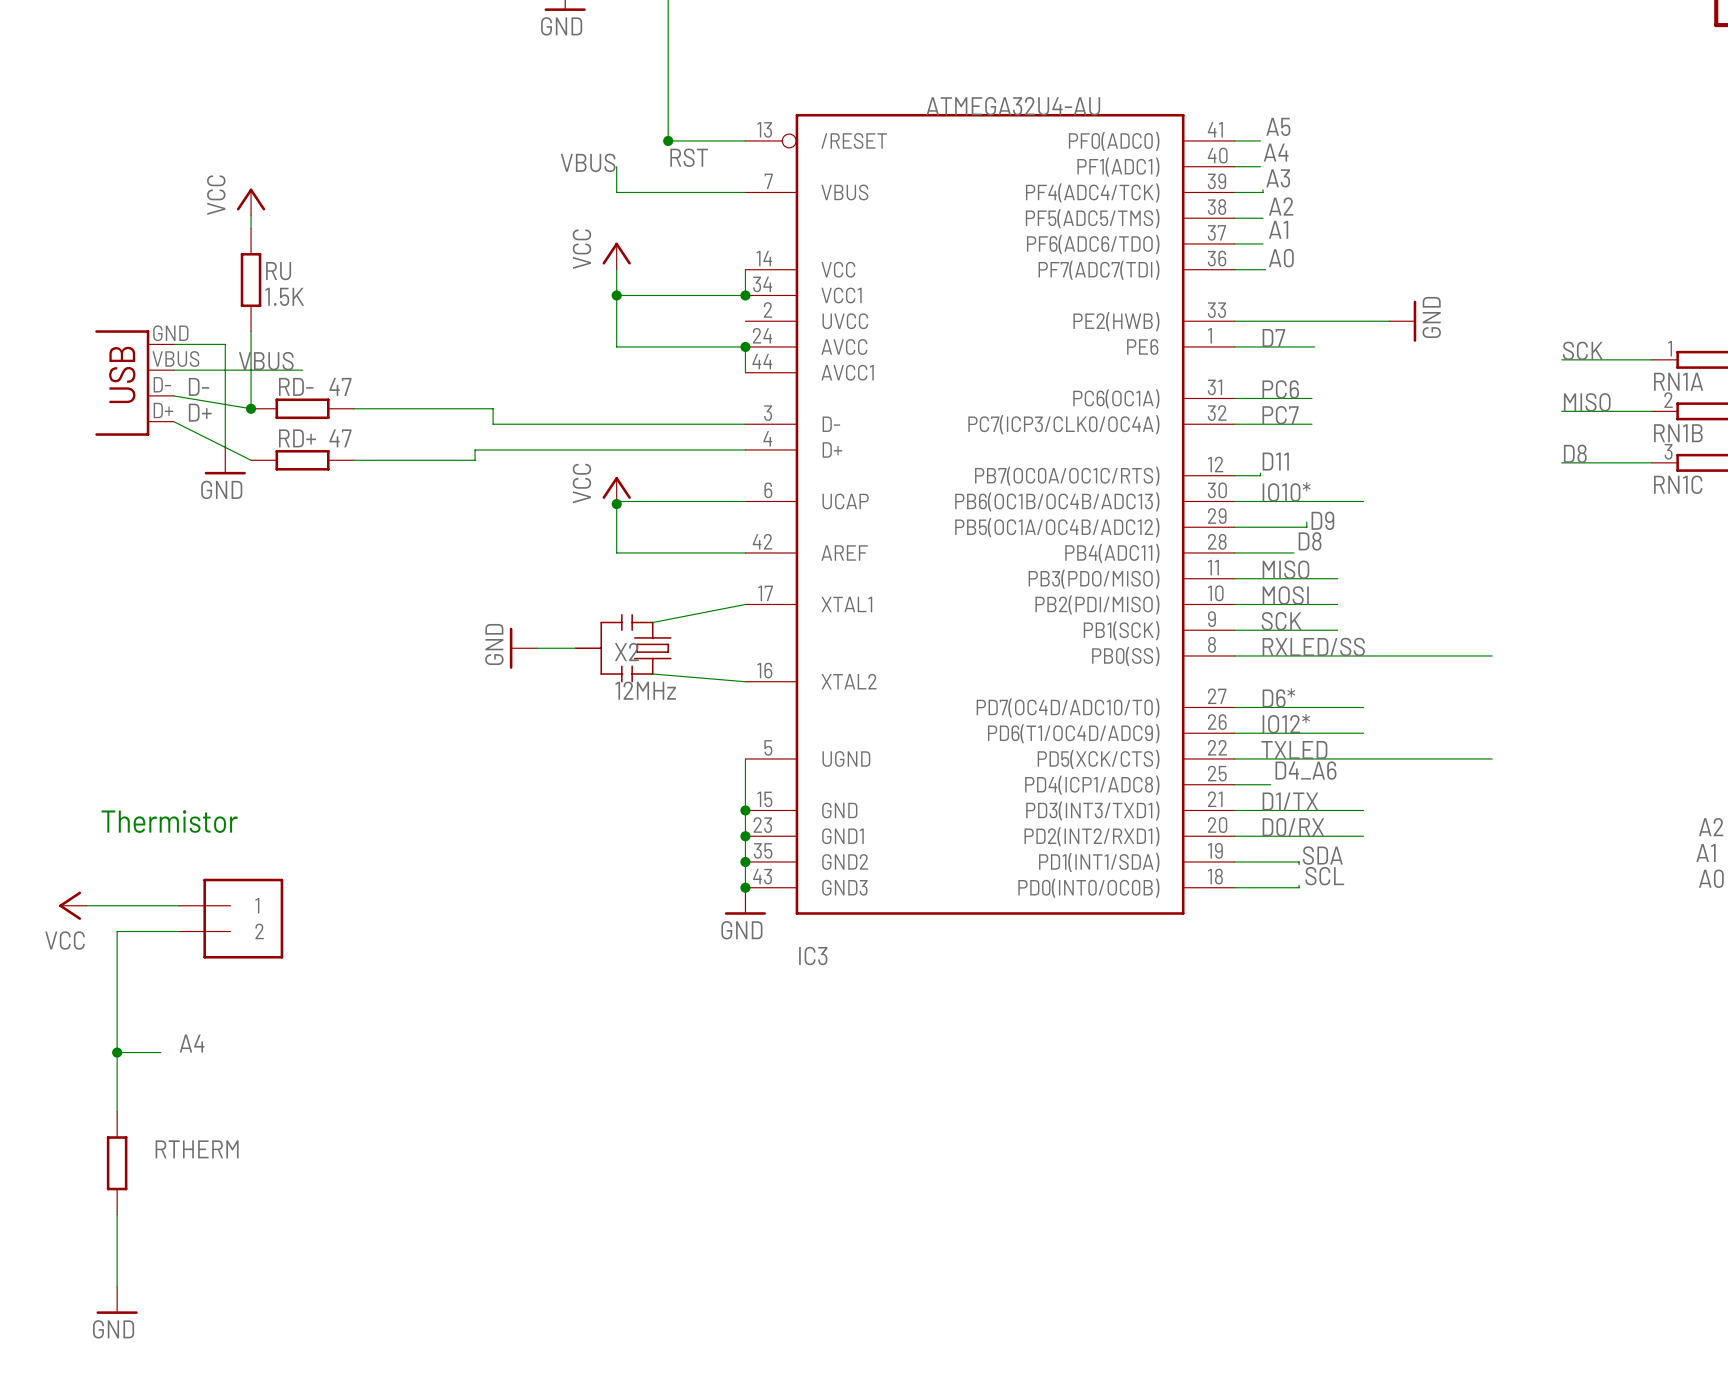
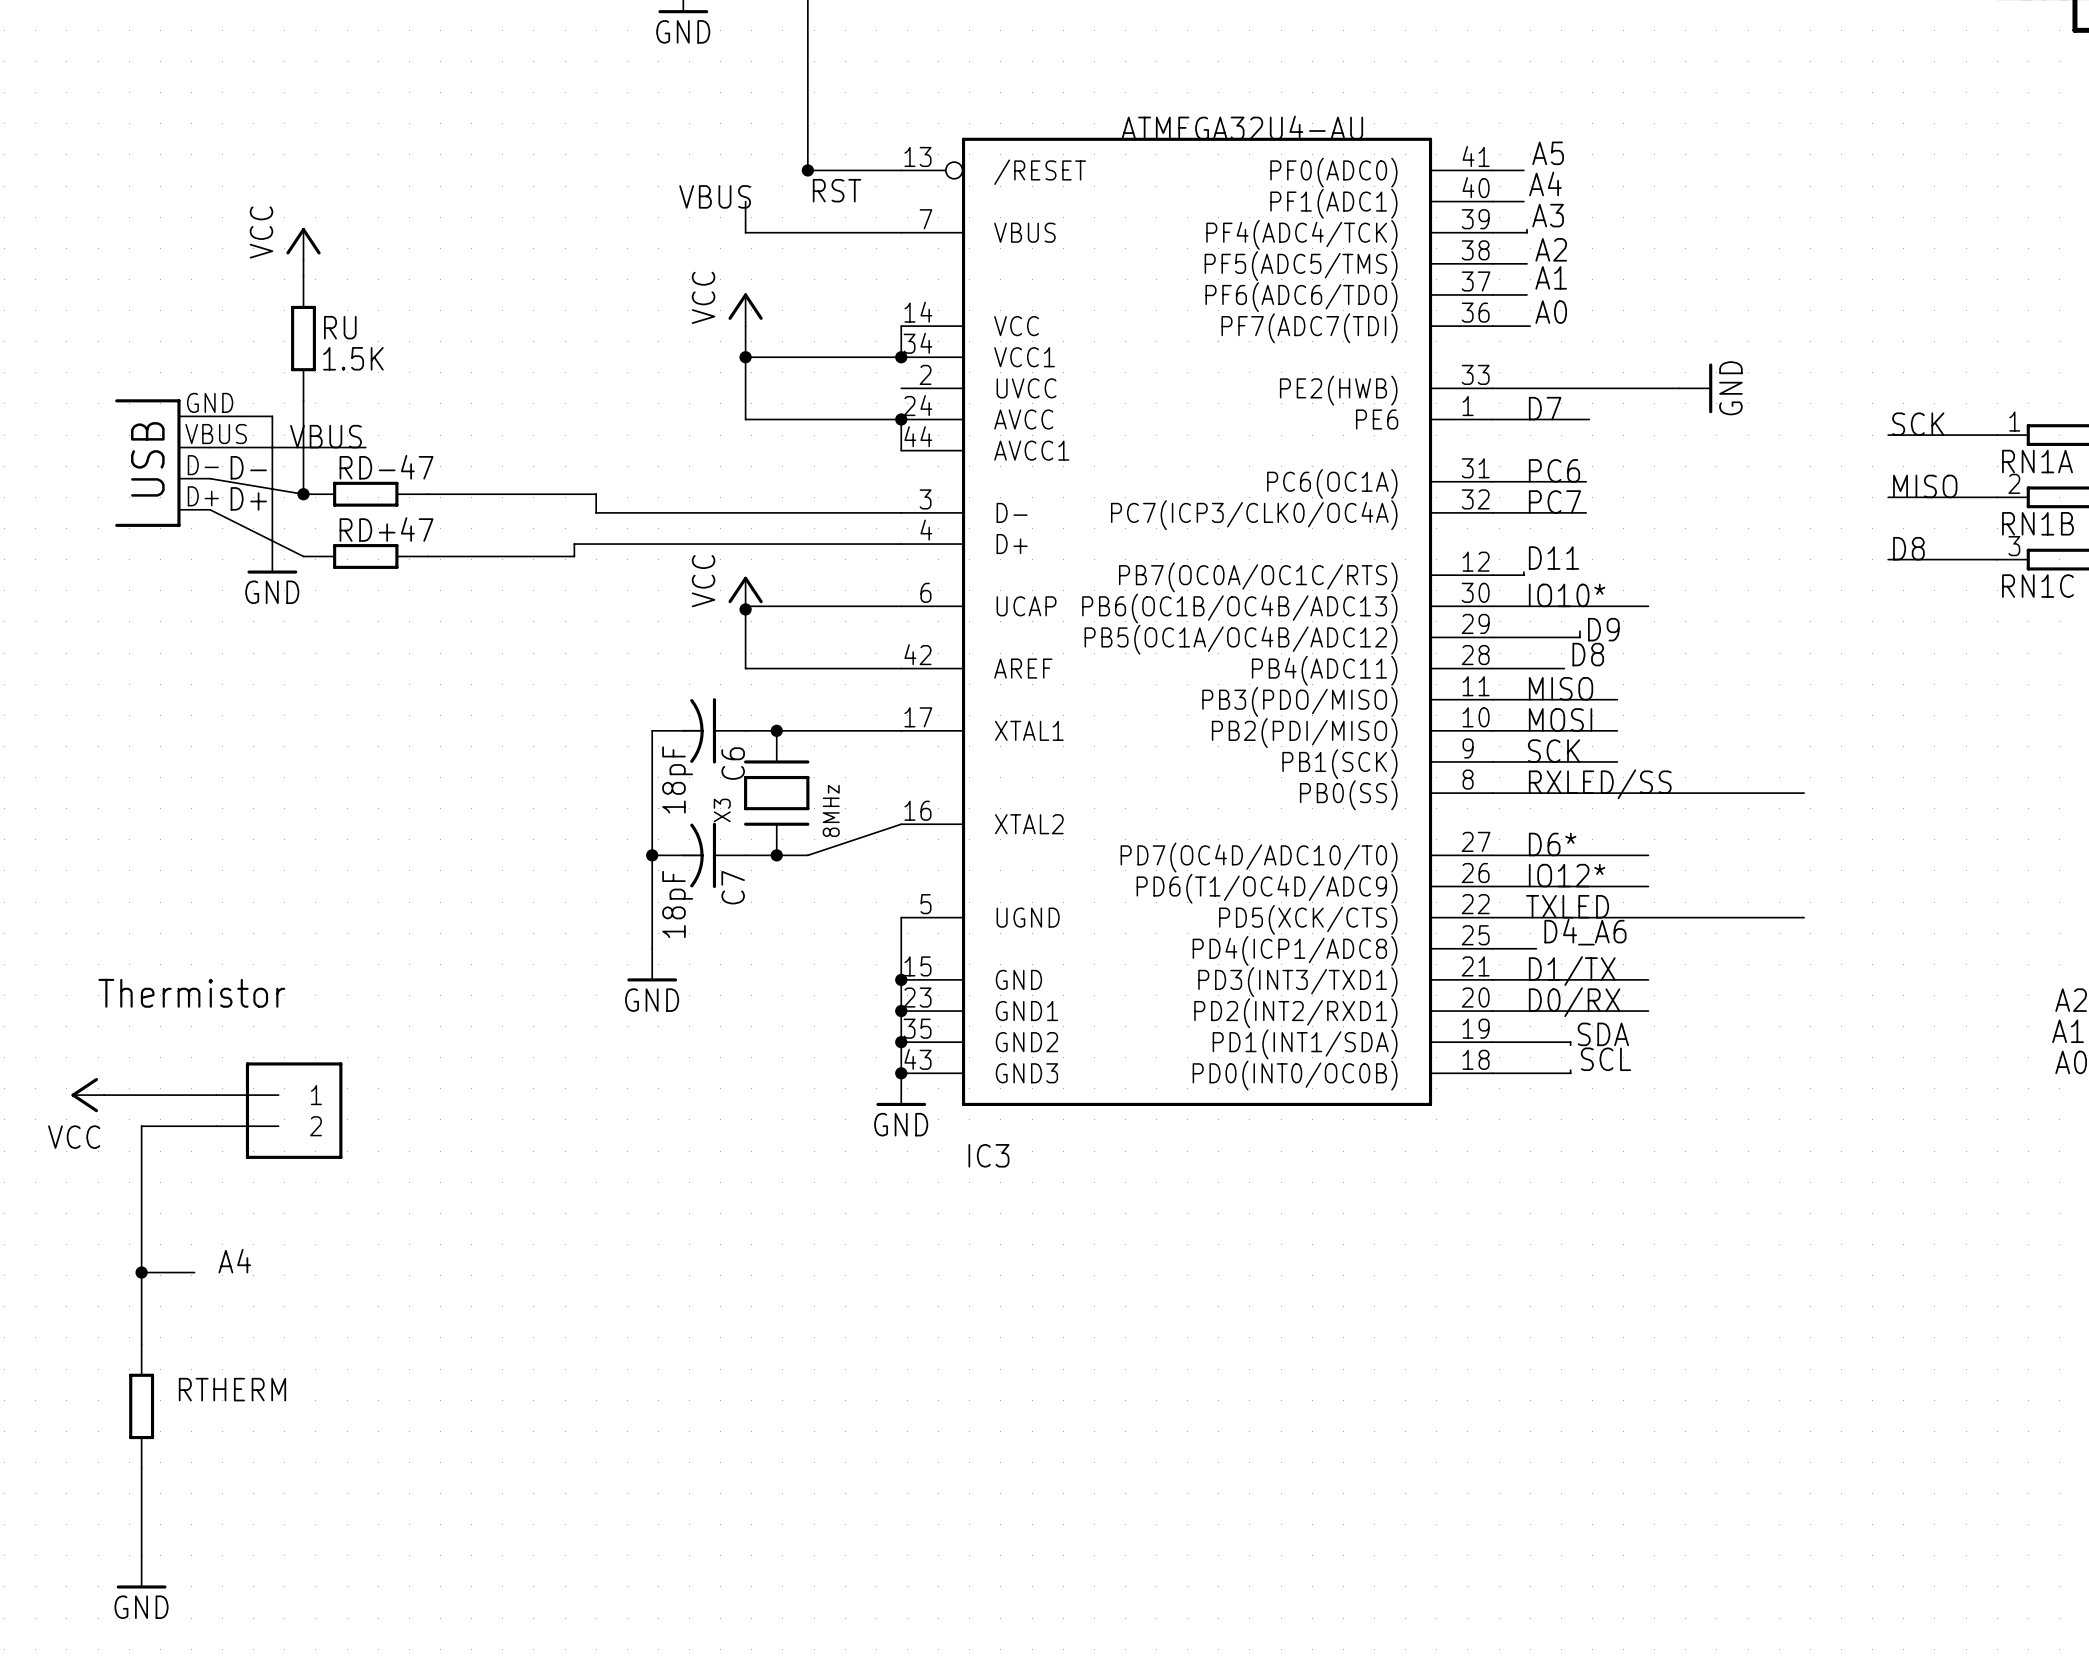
wire: none -> (652, 730) (652, 948)
C6: none -> 18pF (698, 730)
junction: none -> (776, 730)
wire: (745, 604) (652, 622) -> (901, 730) (745, 730)
power symbol rotation: 0° (511, 648) -> 90° counterclockwise (652, 979)
power symbol position: GND (523, 648) -> GND (652, 965)
wire: (536, 648) (575, 648) -> none
X2: 12MHz (623, 648) -> none
X3: none -> 8MHz (776, 793)
wire: (652, 674) (745, 681) -> (745, 855) (807, 855) (901, 824)
junction: none -> (652, 855)
C7: none -> 18pF (698, 855)
junction: none -> (776, 855)

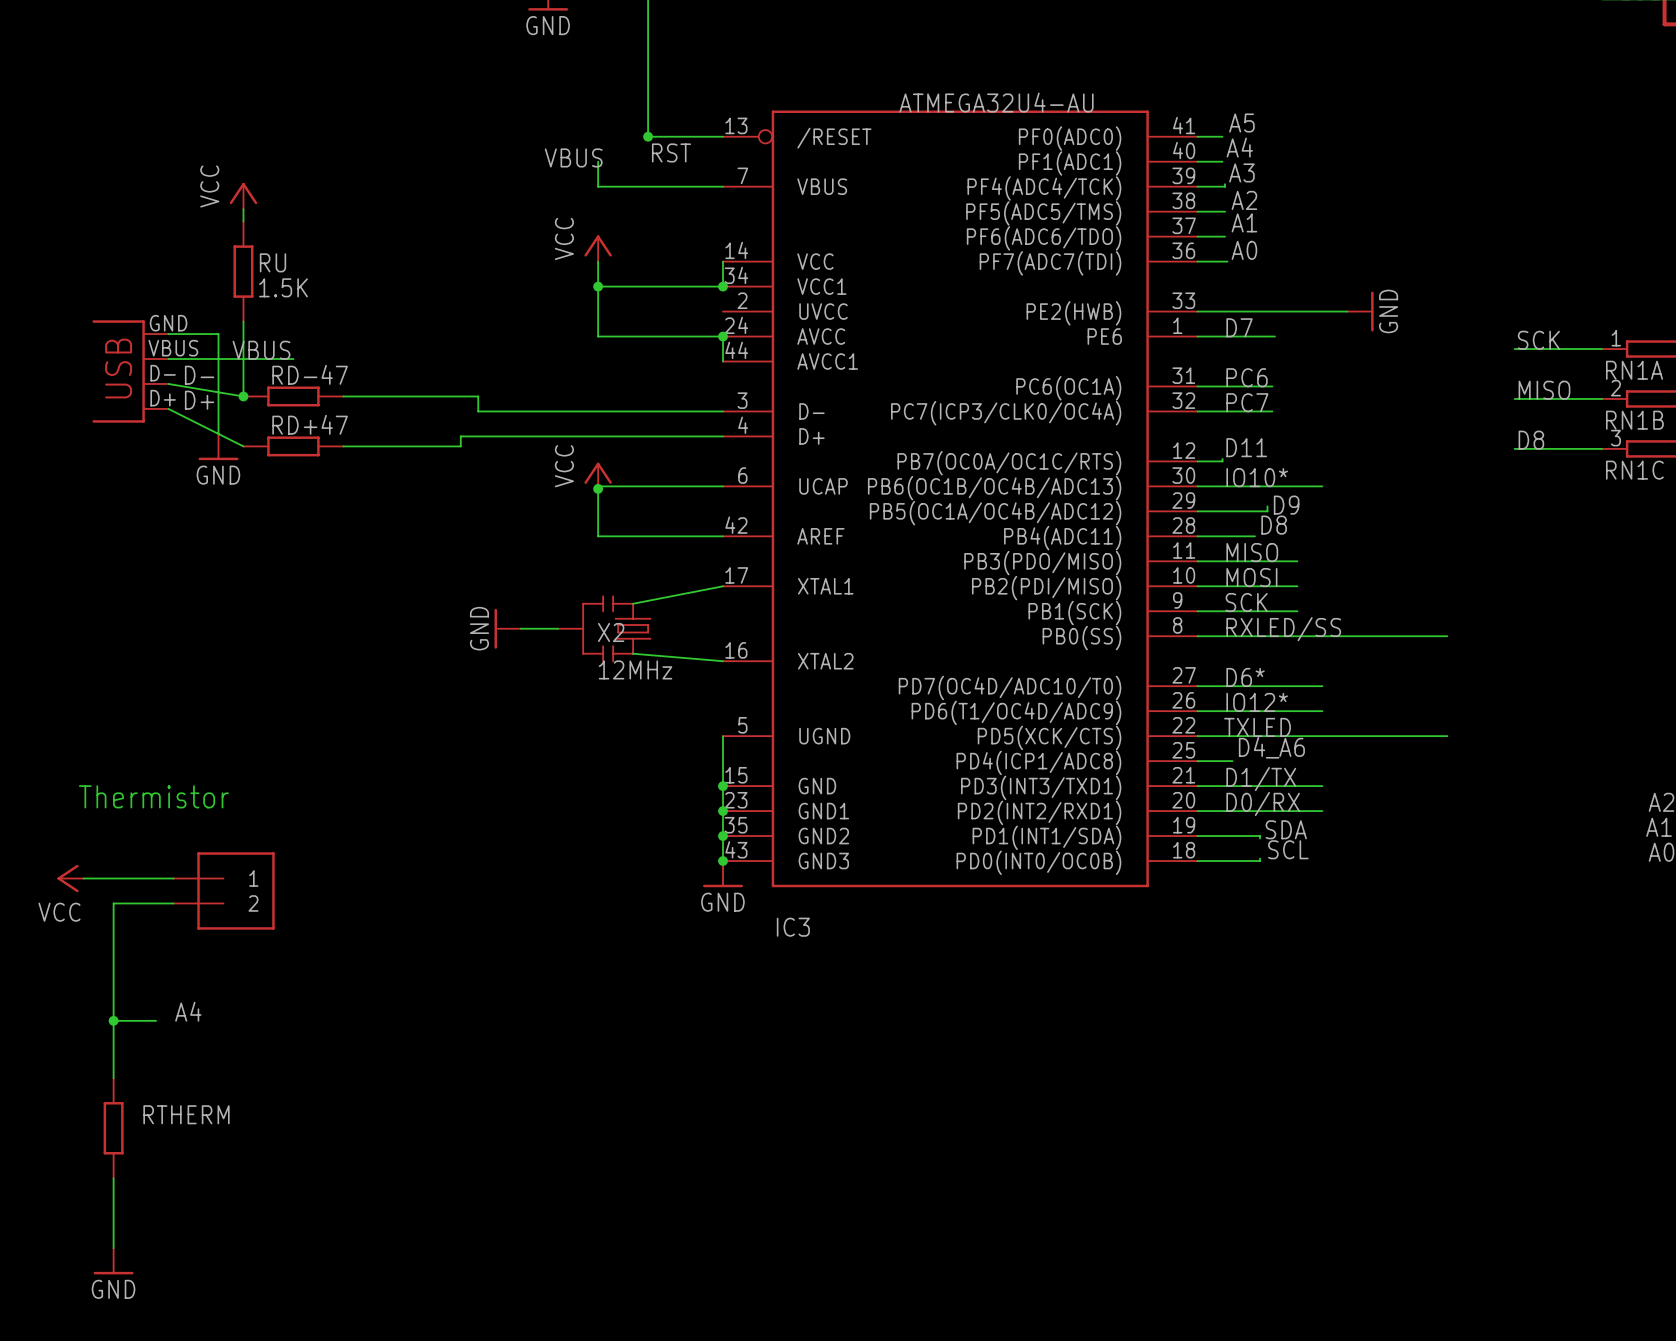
wire: (652, 730) (652, 948) -> none
C6: 18pF (698, 730) -> none
wire: (745, 730) (901, 730) -> (633, 603) (723, 586)
junction: (776, 730) -> none
wire: none -> (520, 628) (558, 628)
X2: none -> 12MHz (604, 628)
X3: 8MHz (776, 793) -> none
wire: (901, 824) (807, 855) (745, 855) -> (723, 661) (633, 653)
junction: (652, 855) -> none
C7: 18pF (698, 855) -> none
junction: (776, 855) -> none
power symbol position: GND (652, 965) -> GND (507, 628)
power symbol rotation: 0° (652, 979) -> 90° clockwise (495, 628)

